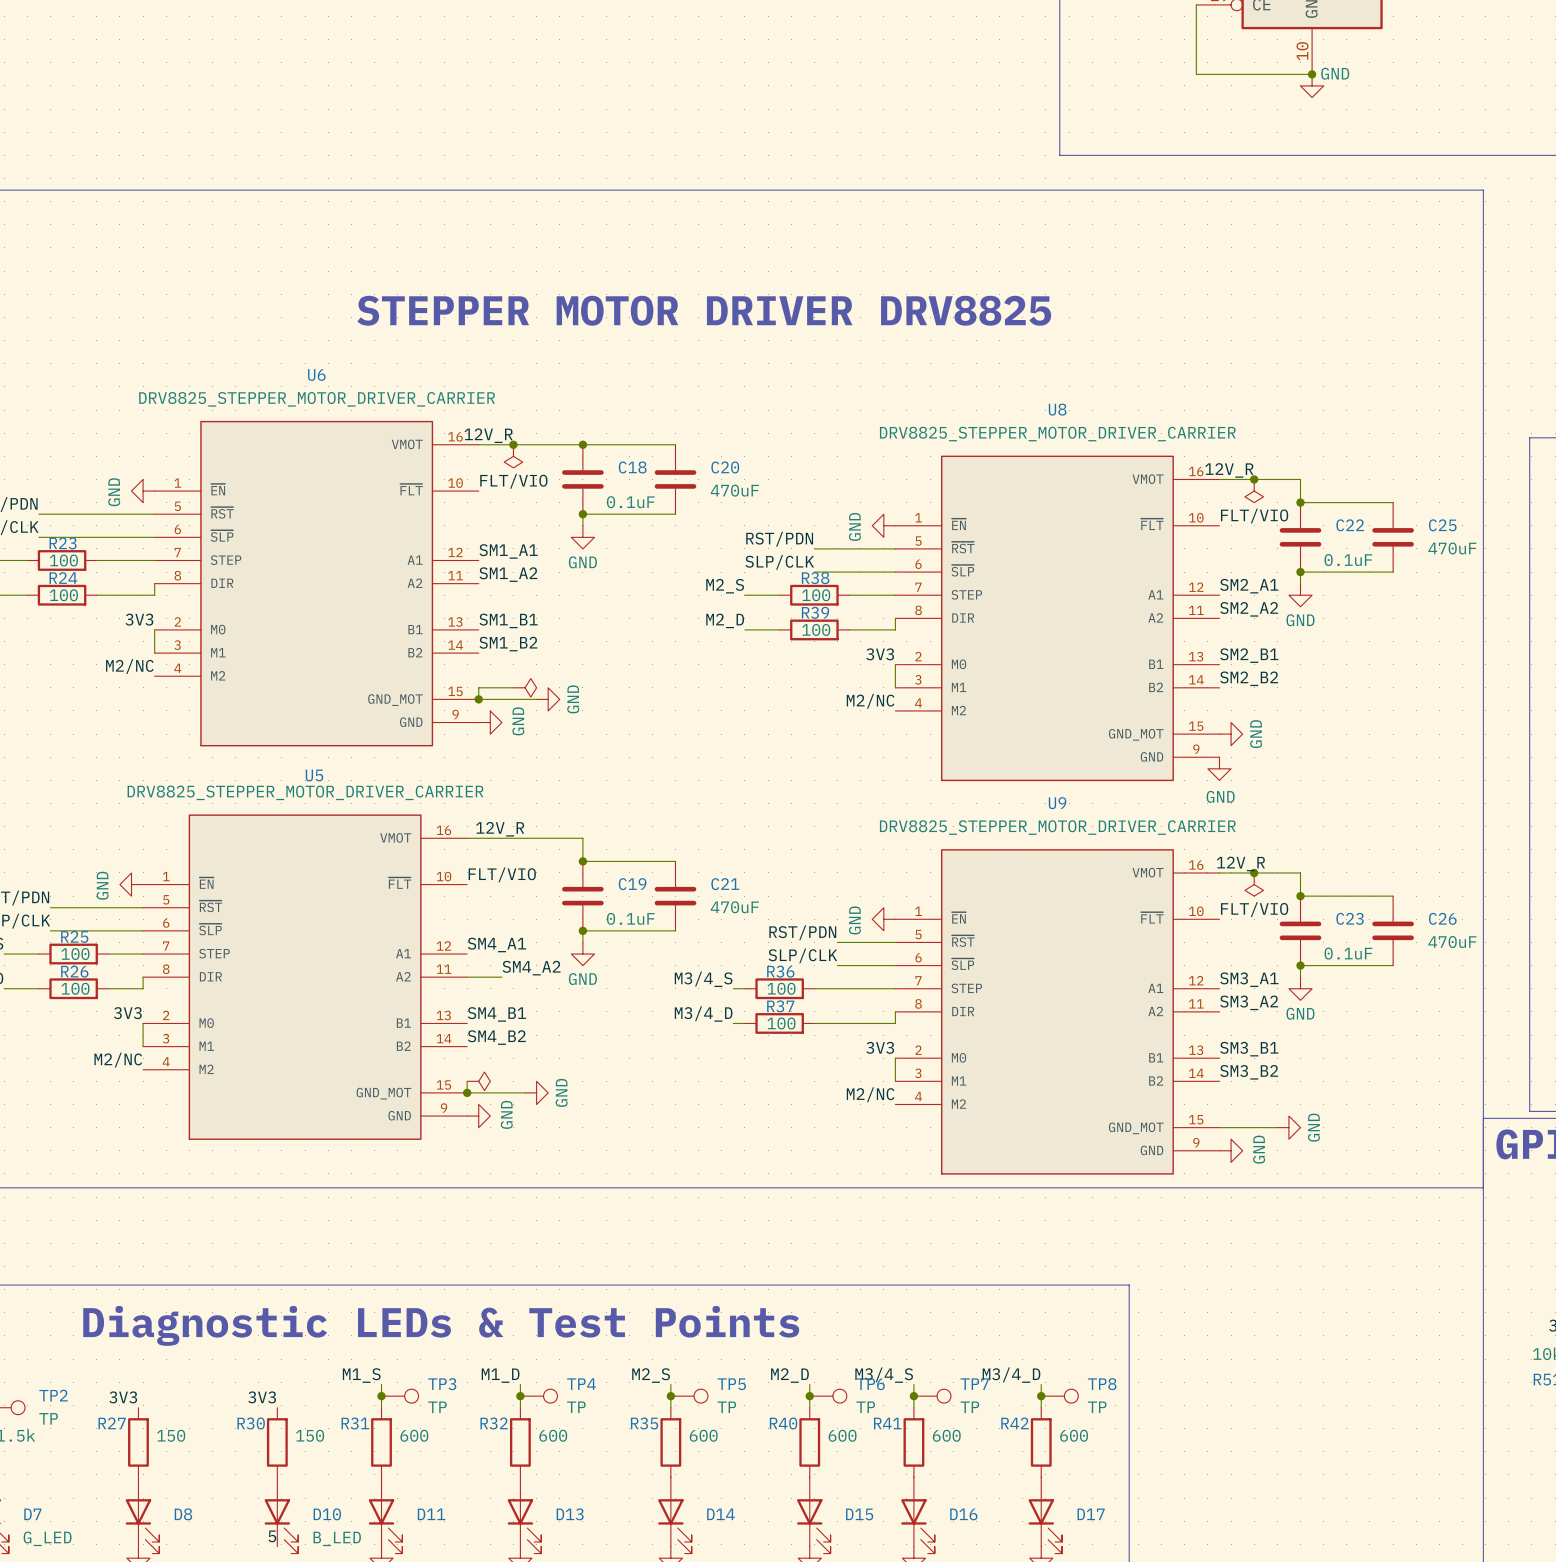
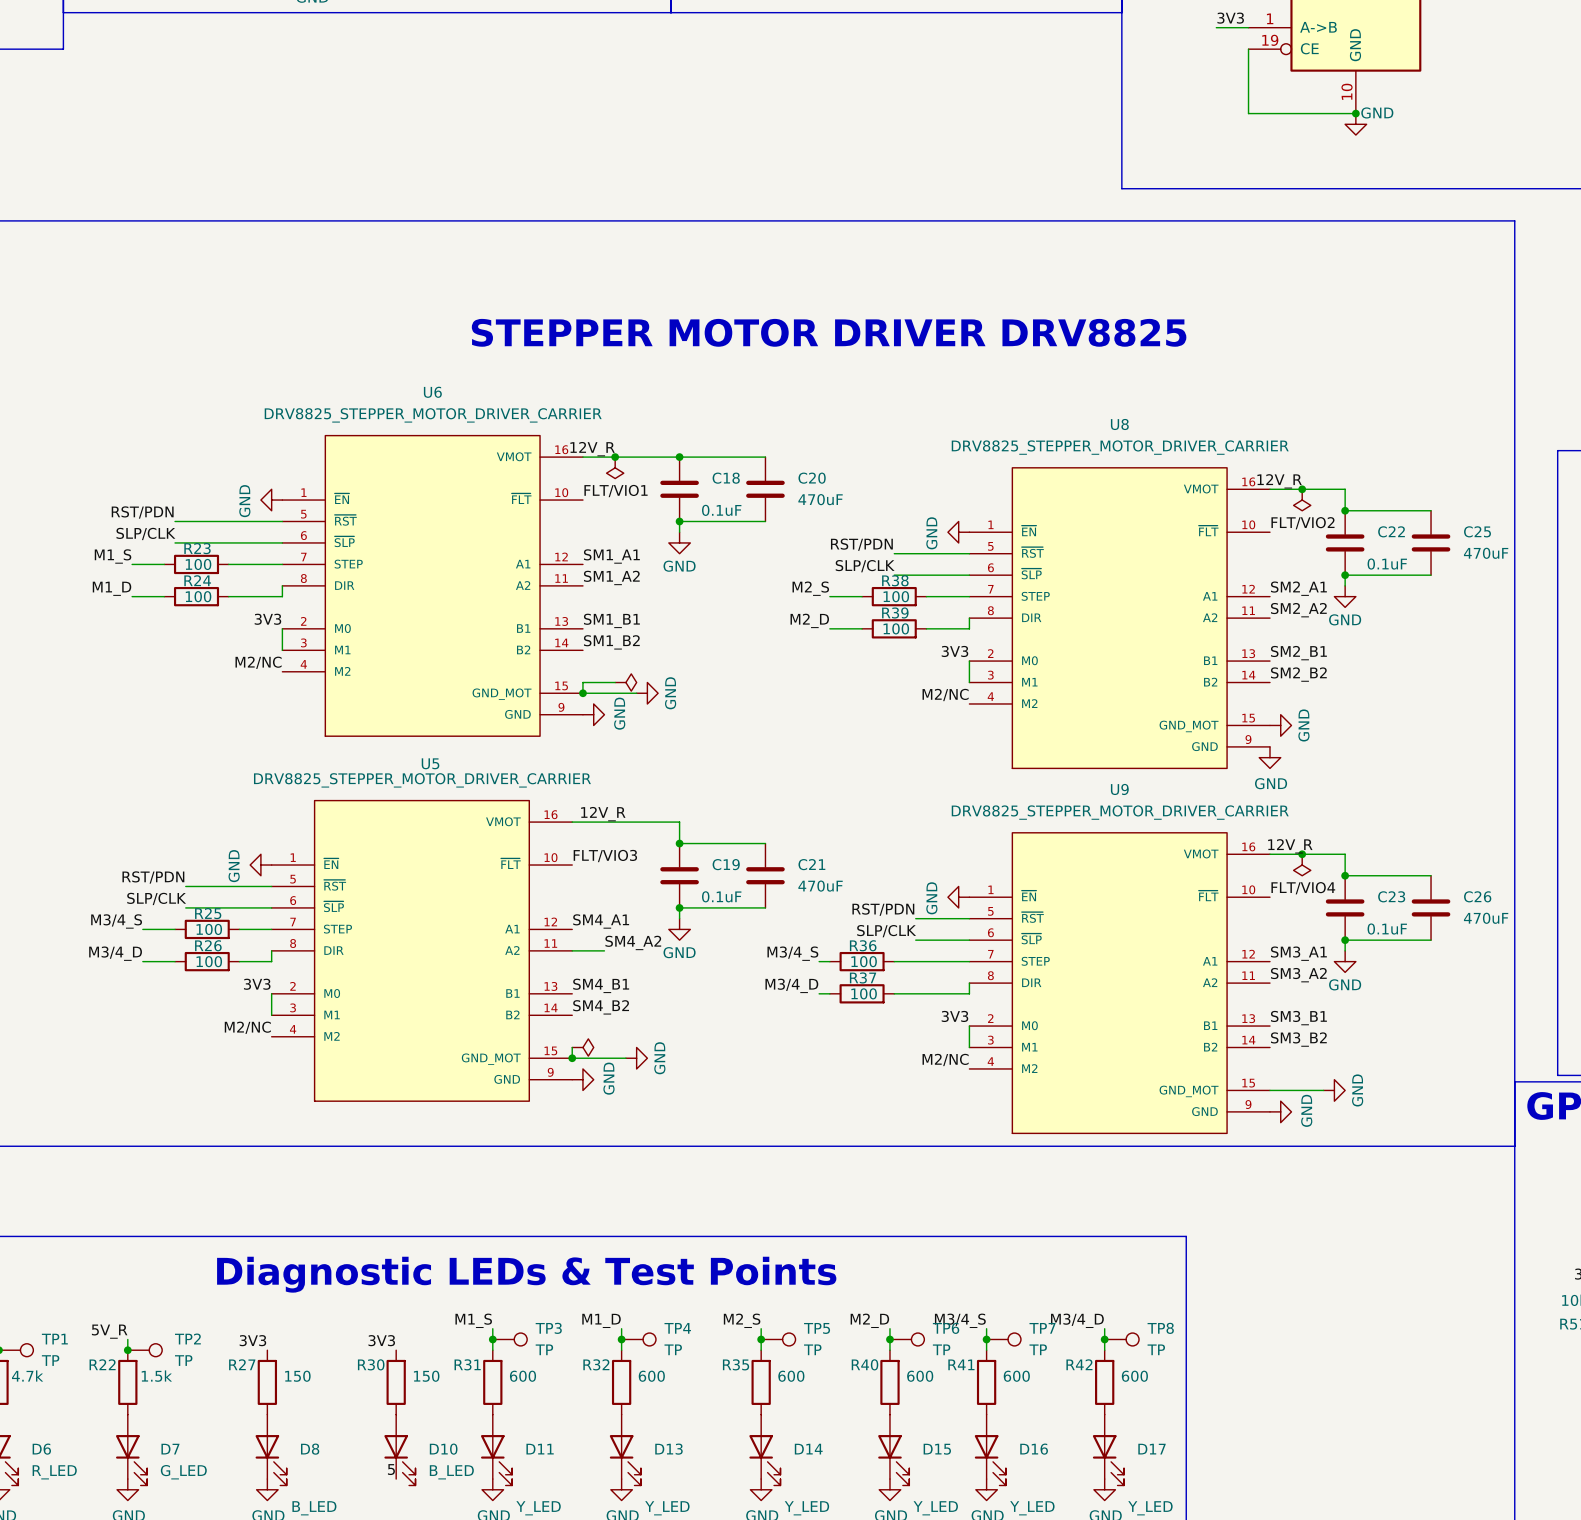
label: FLT/VIO (513, 481) -> FLT/VIO1 (616, 491)
label: FLT/VIO (1254, 516) -> FLT/VIO2 (1302, 523)
label: FLT/VIO (502, 874) -> FLT/VIO3 (605, 856)
label: FLT/VIO (1254, 909) -> FLT/VIO4 (1303, 888)

